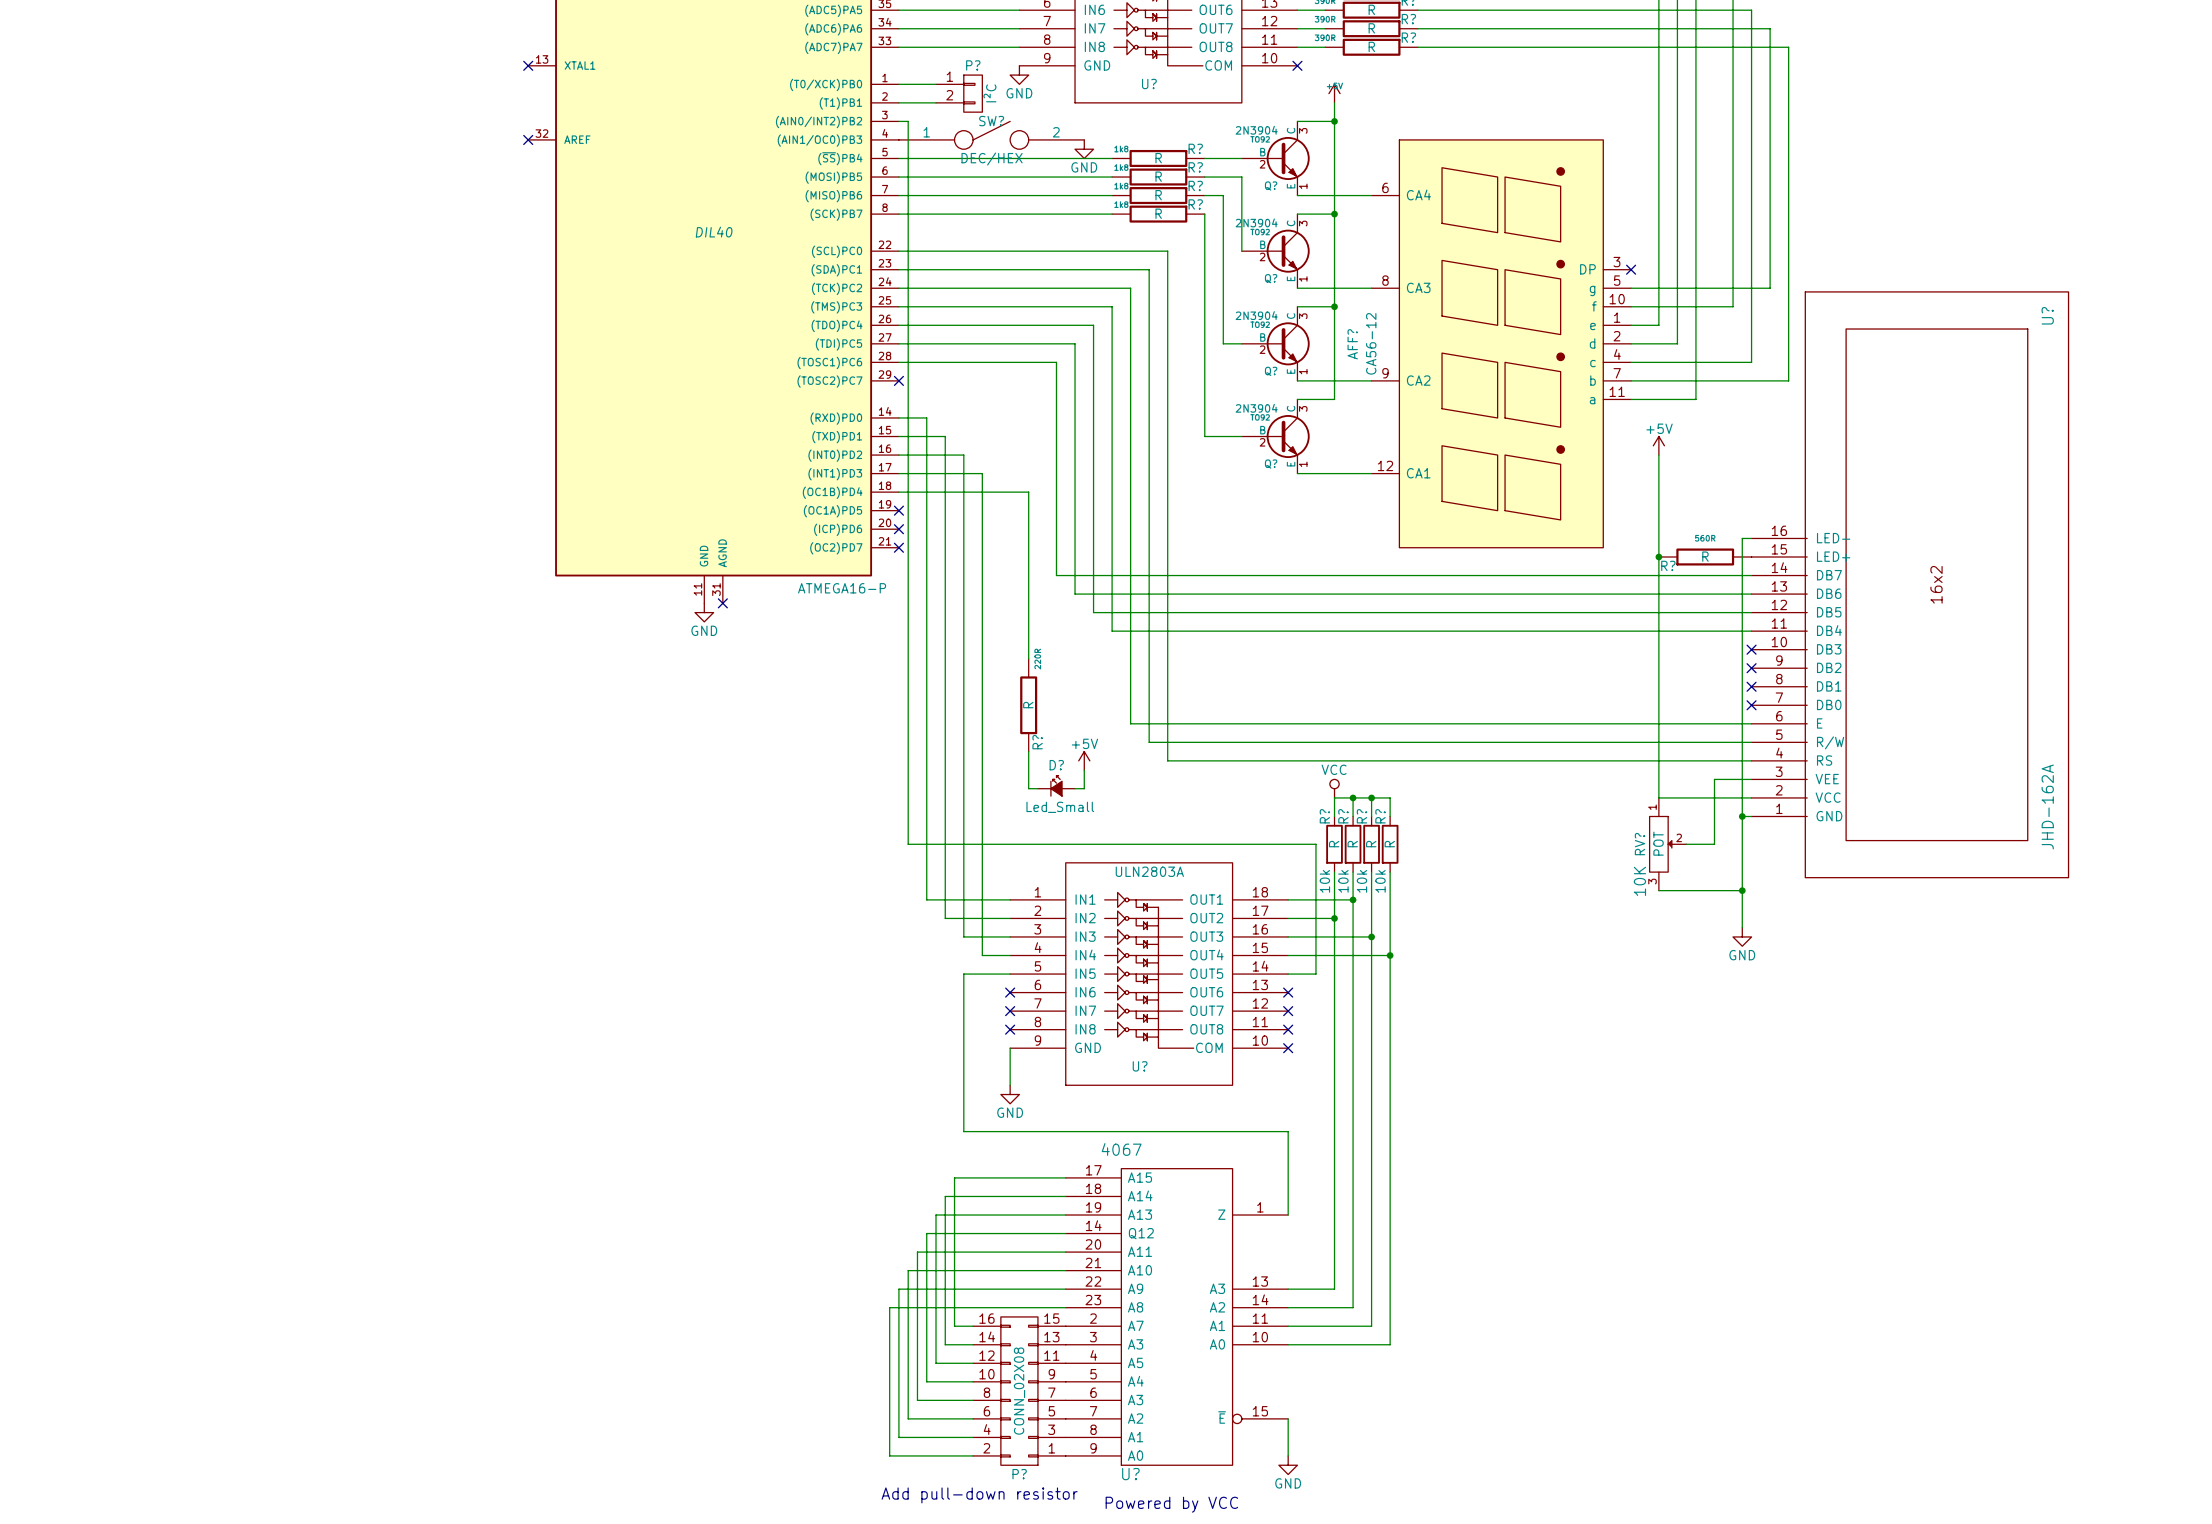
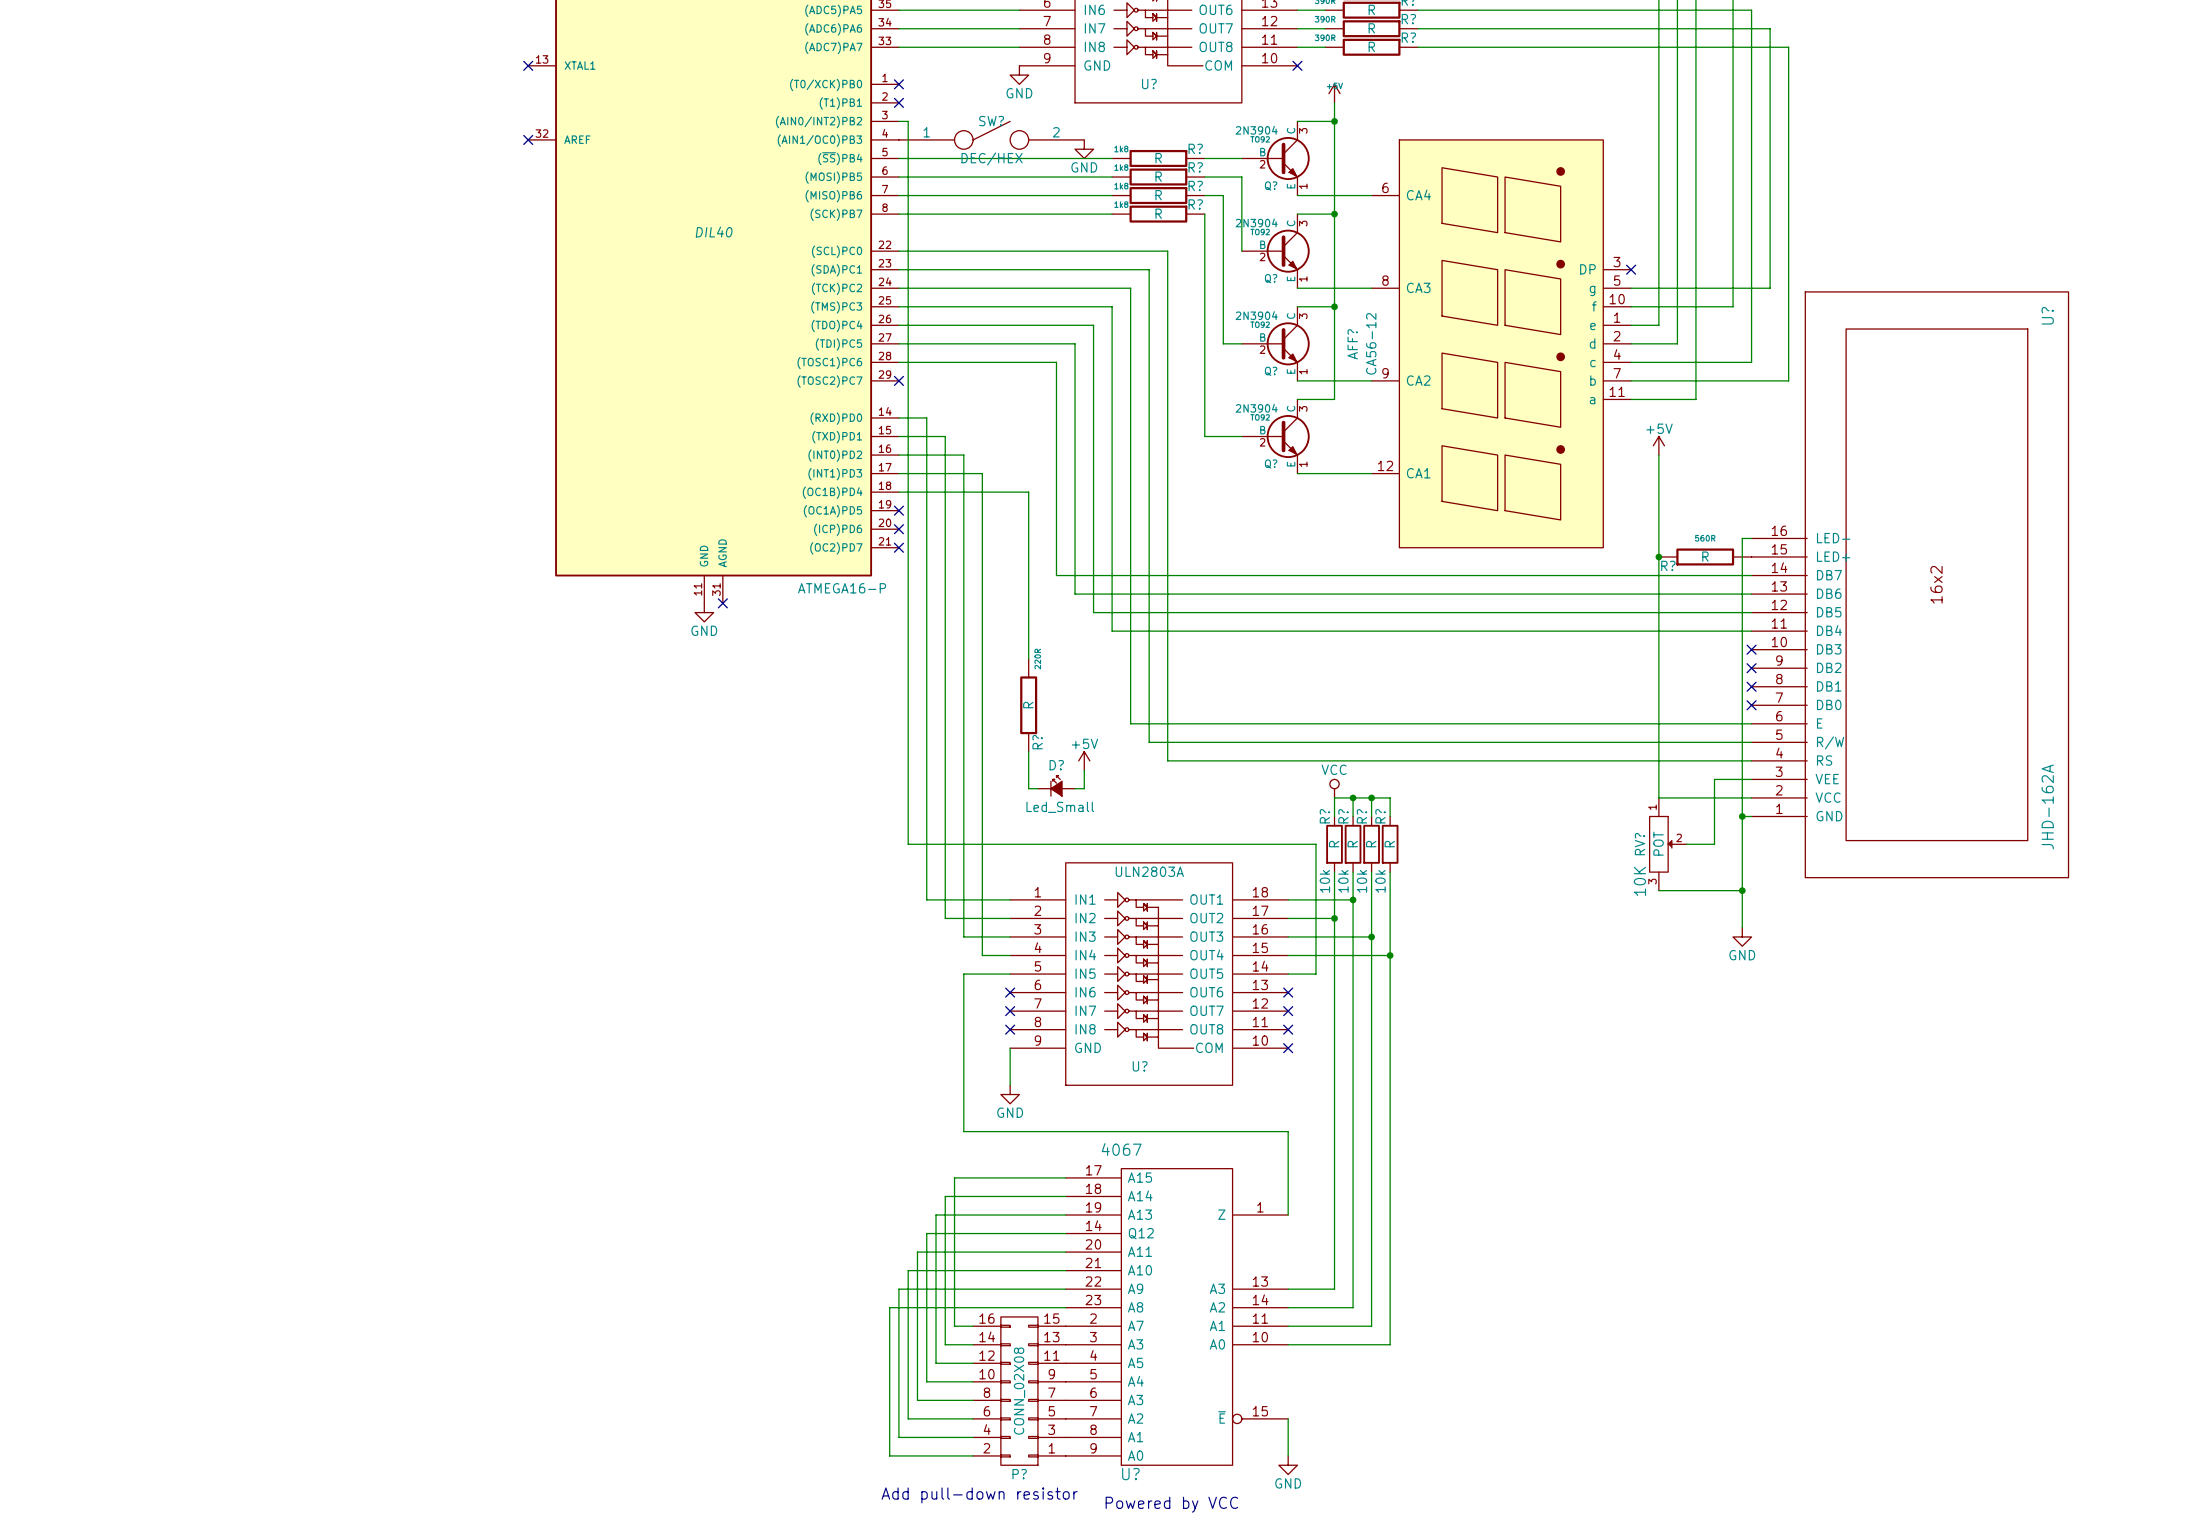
wire: (898, 84) (936, 84) -> none
no-connect mark: none -> (898, 84)
P?: I²C (959, 93) -> none
wire: (898, 102) (936, 102) -> none
no-connect mark: none -> (898, 102)

